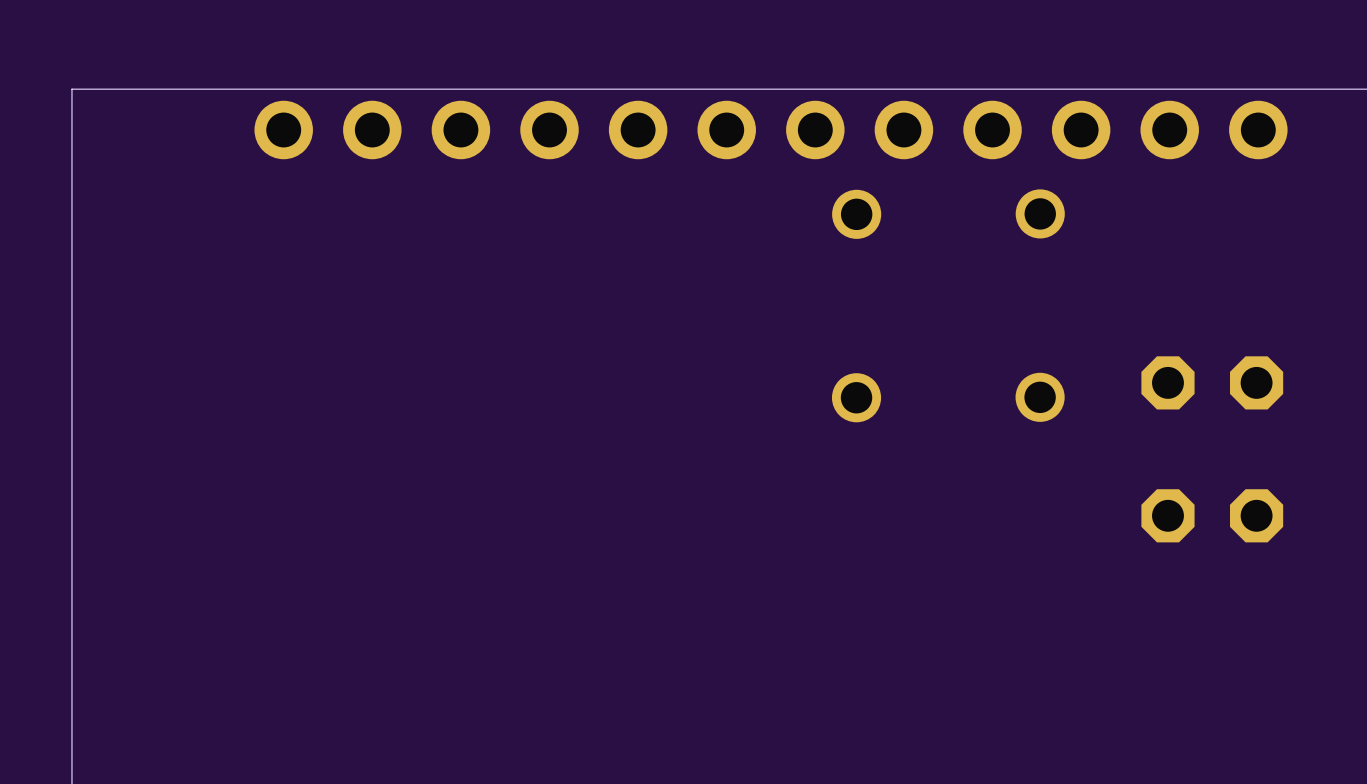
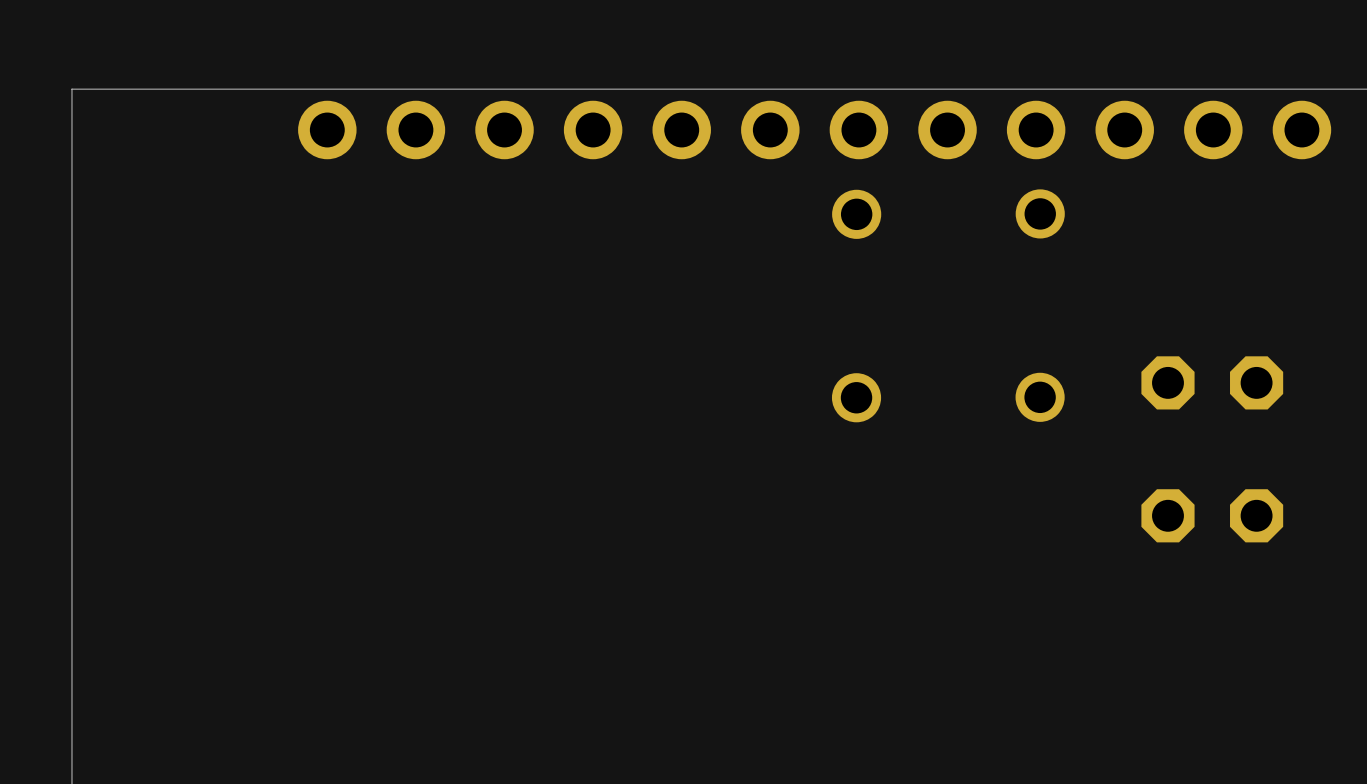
part position: (771, 129) -> (814, 129)

